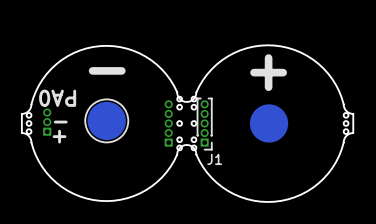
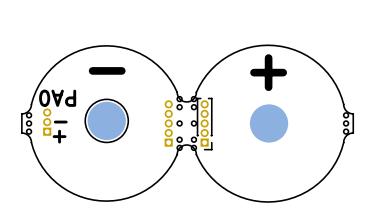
J1 name: J1 (214, 159) -> none

